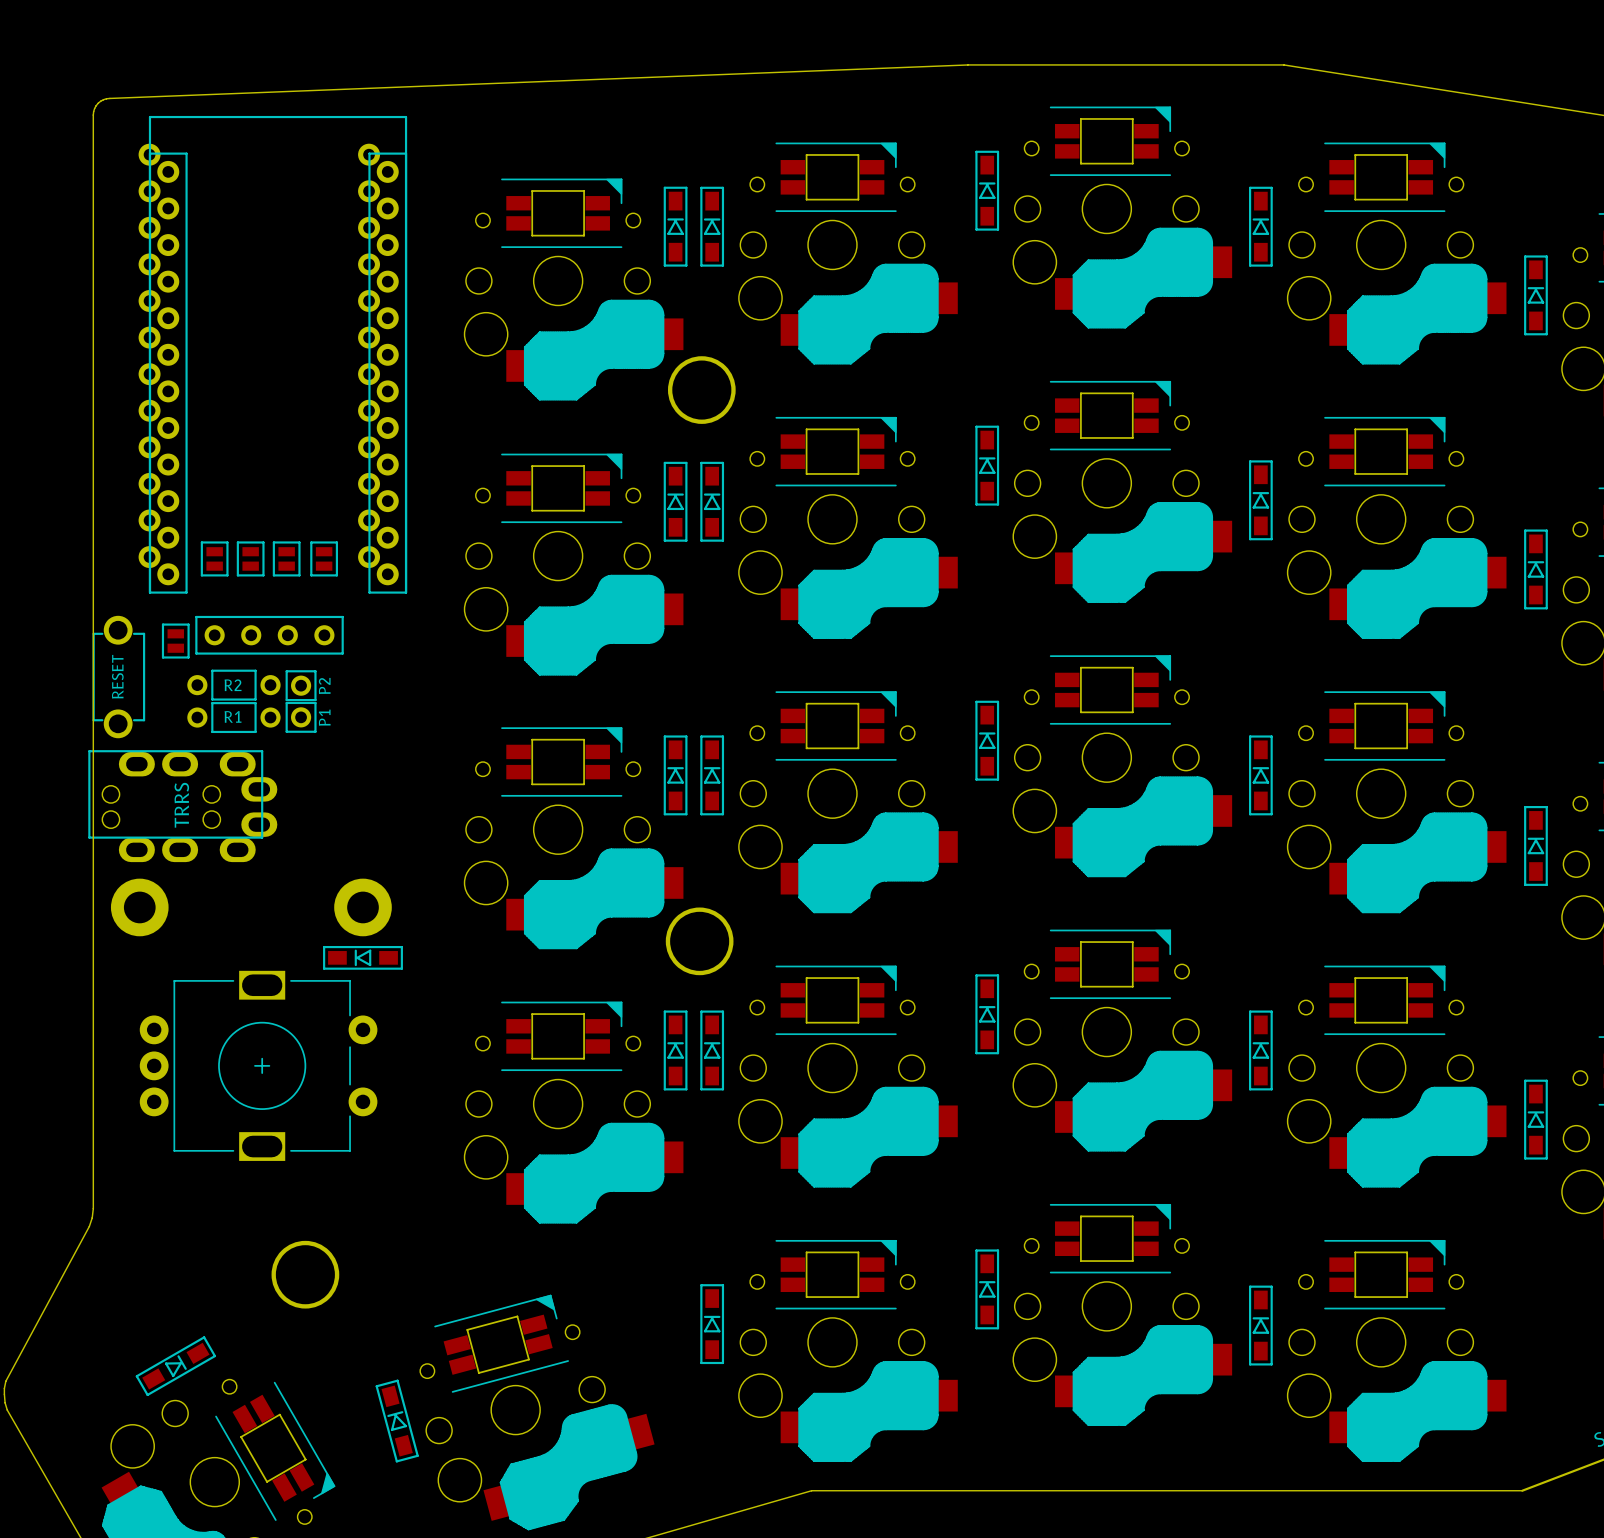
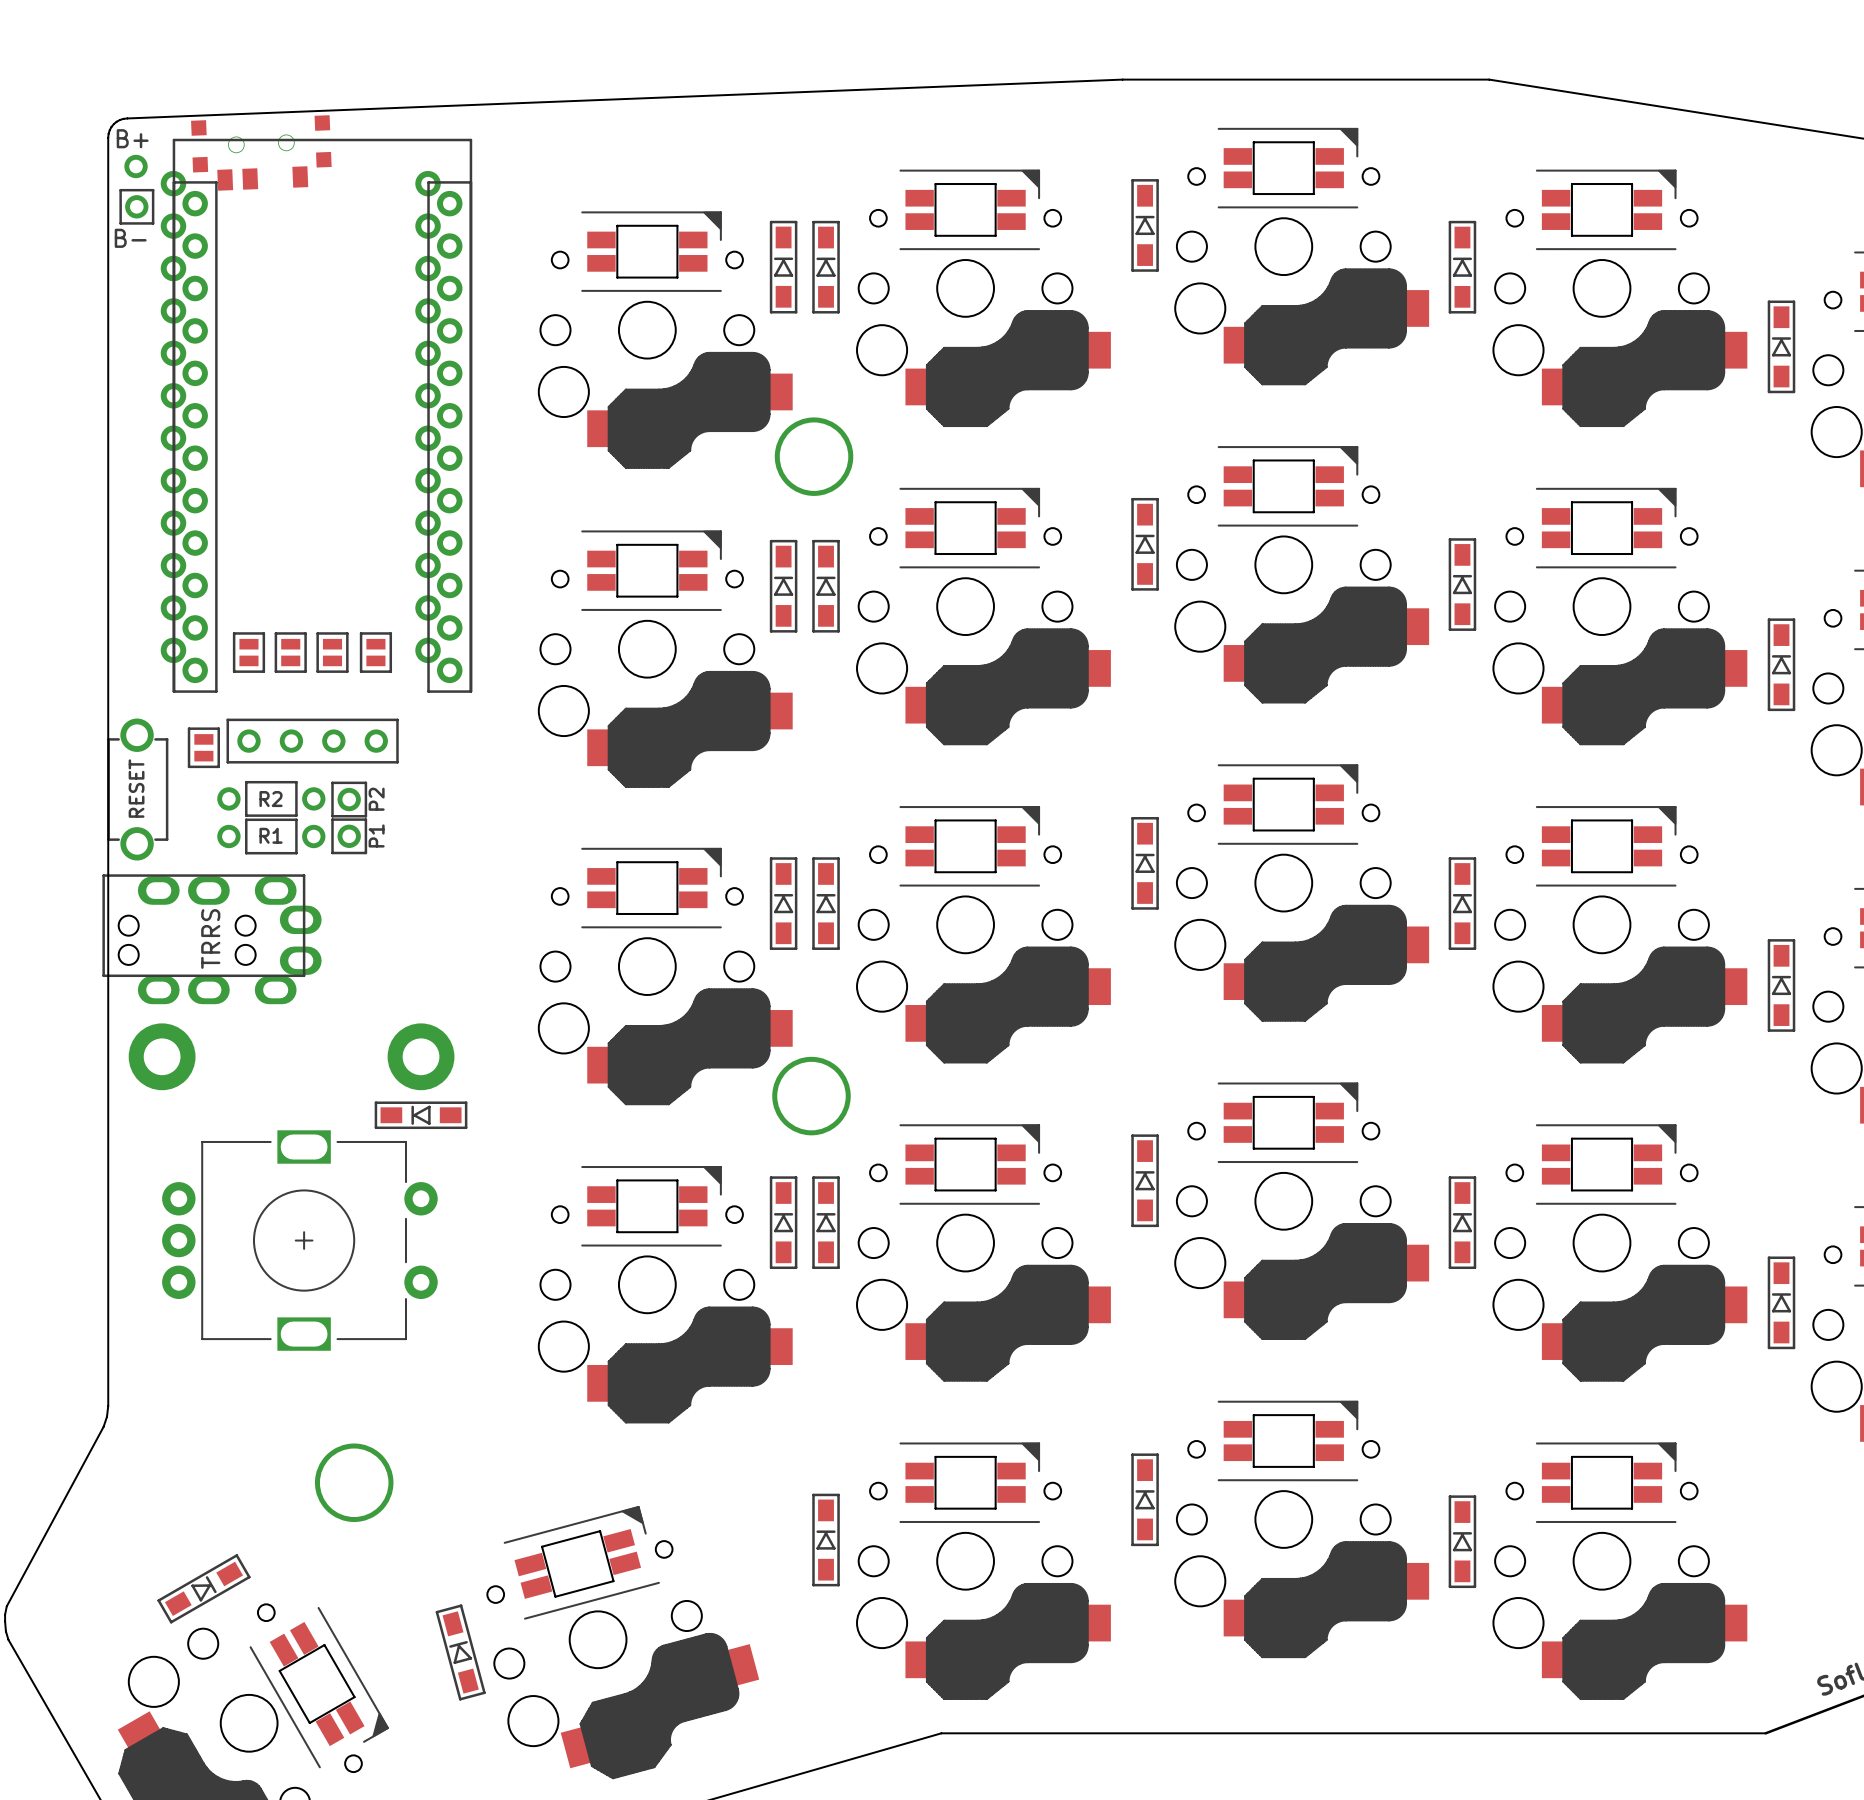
text: none -> B+ (132, 138)
part: none -> (261, 152)
part: none -> (136, 166)
line: none -> (120, 190) (153, 190) (153, 223) (120, 223) (120, 190)
part: none -> (136, 206)
text: none -> B- (130, 238)

